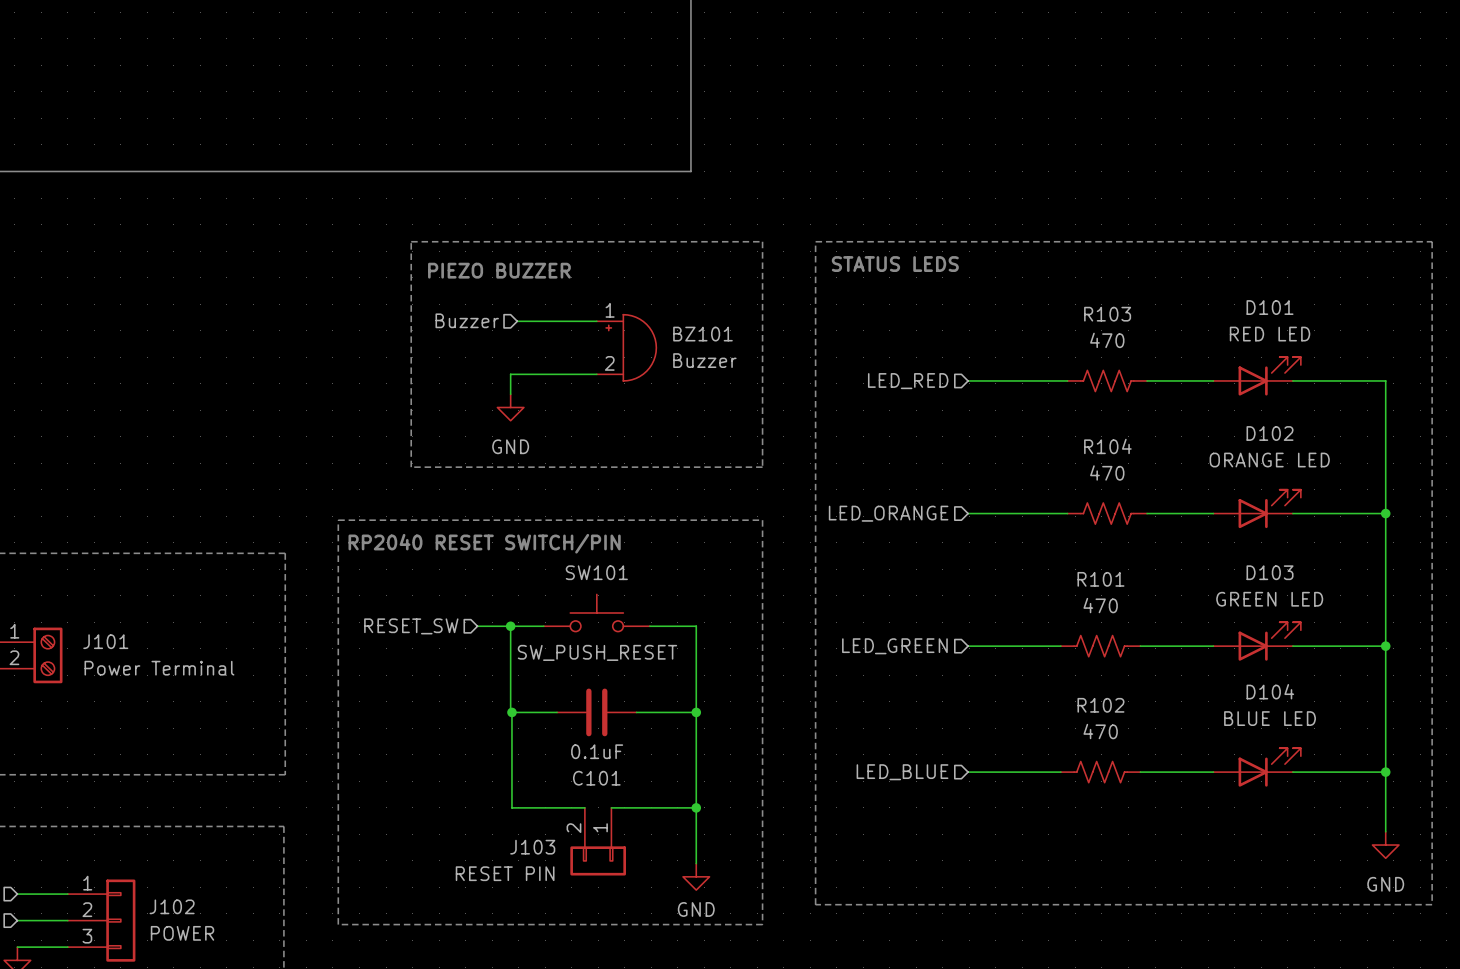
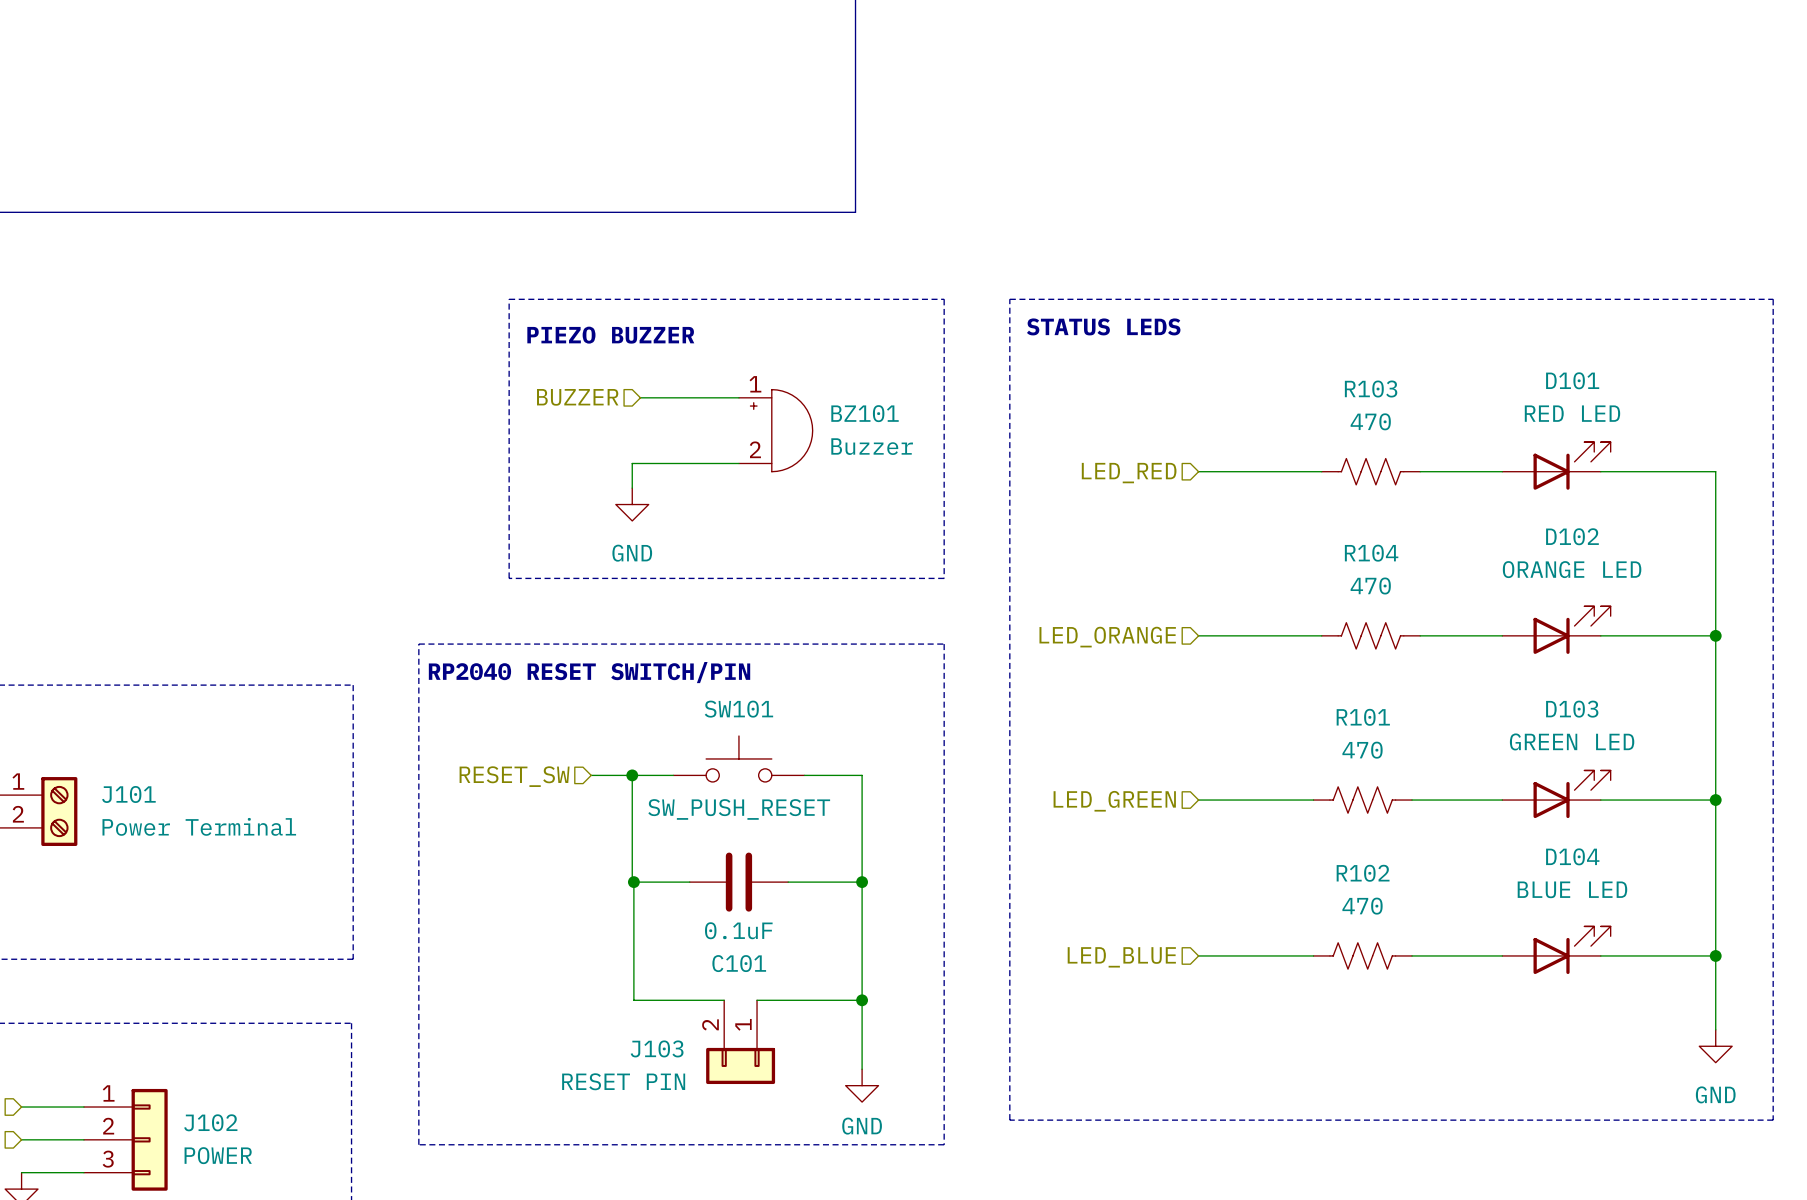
hierarchical label: Buzzer (467, 320) -> BUZZER (577, 397)

